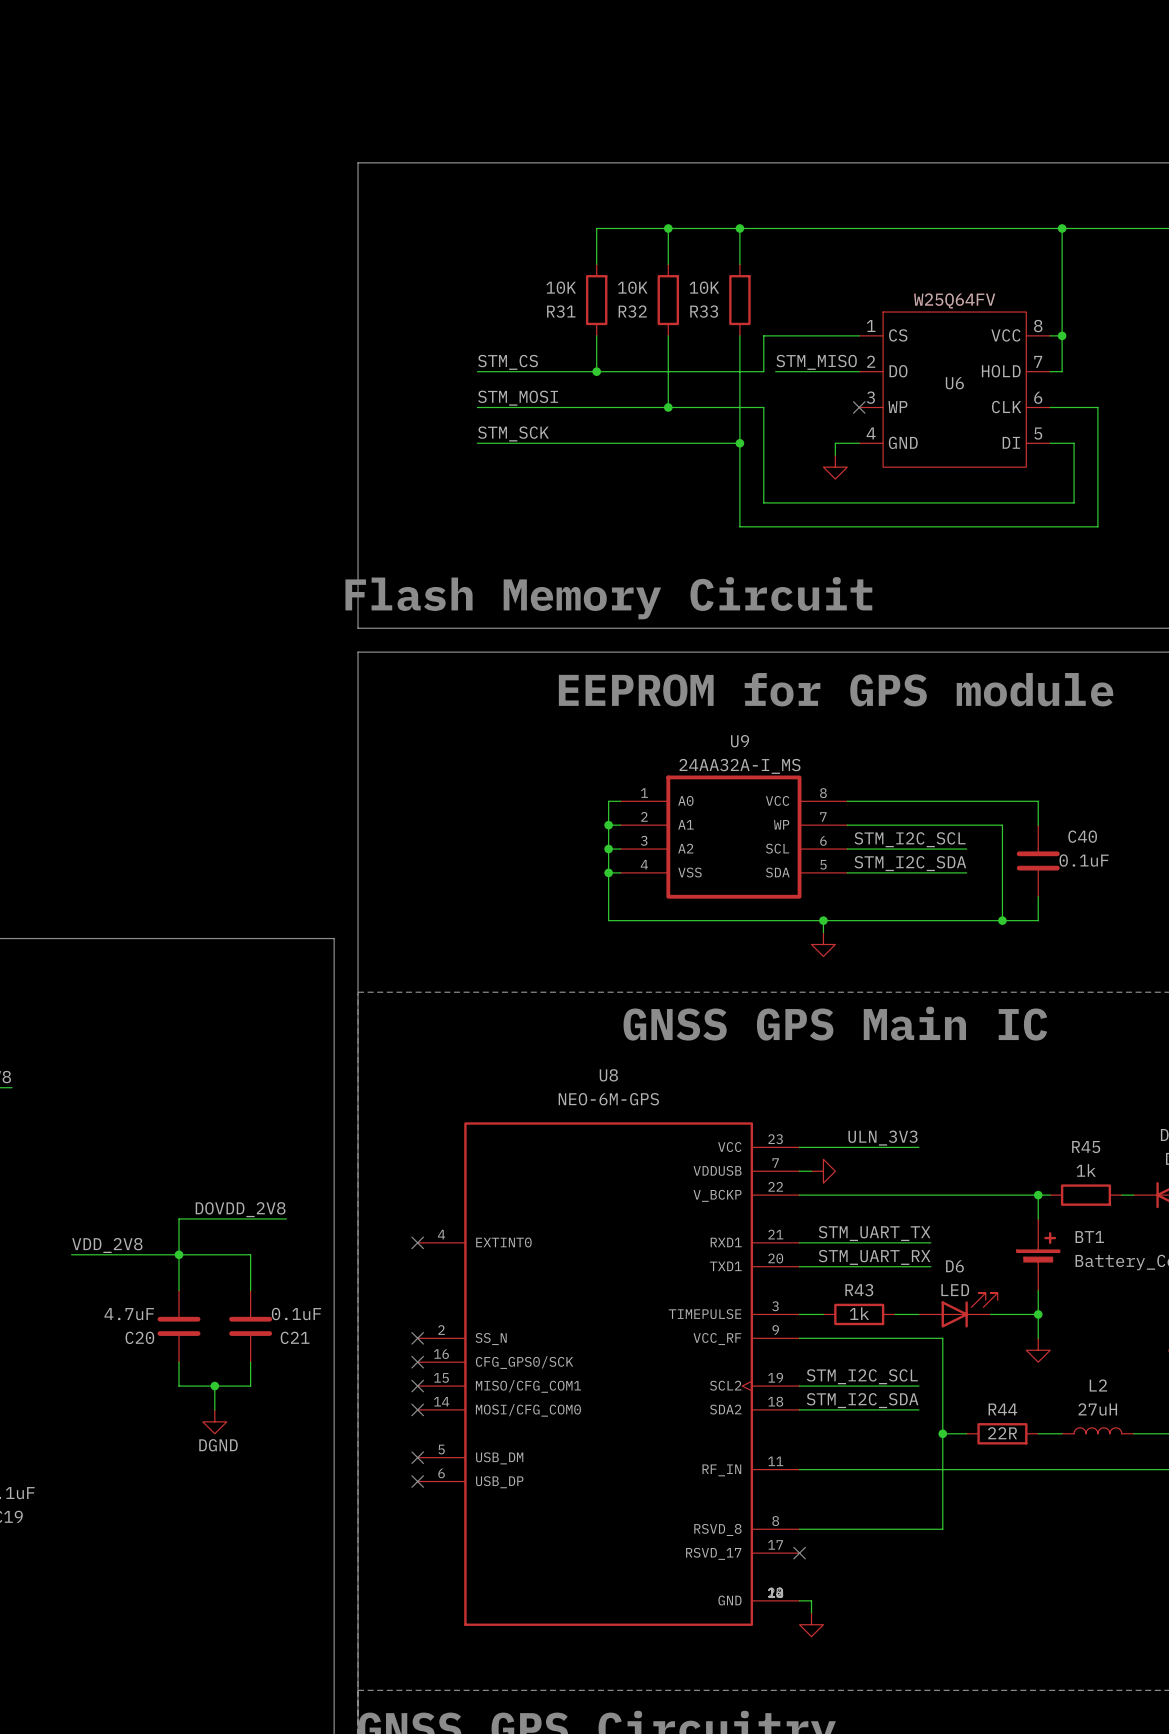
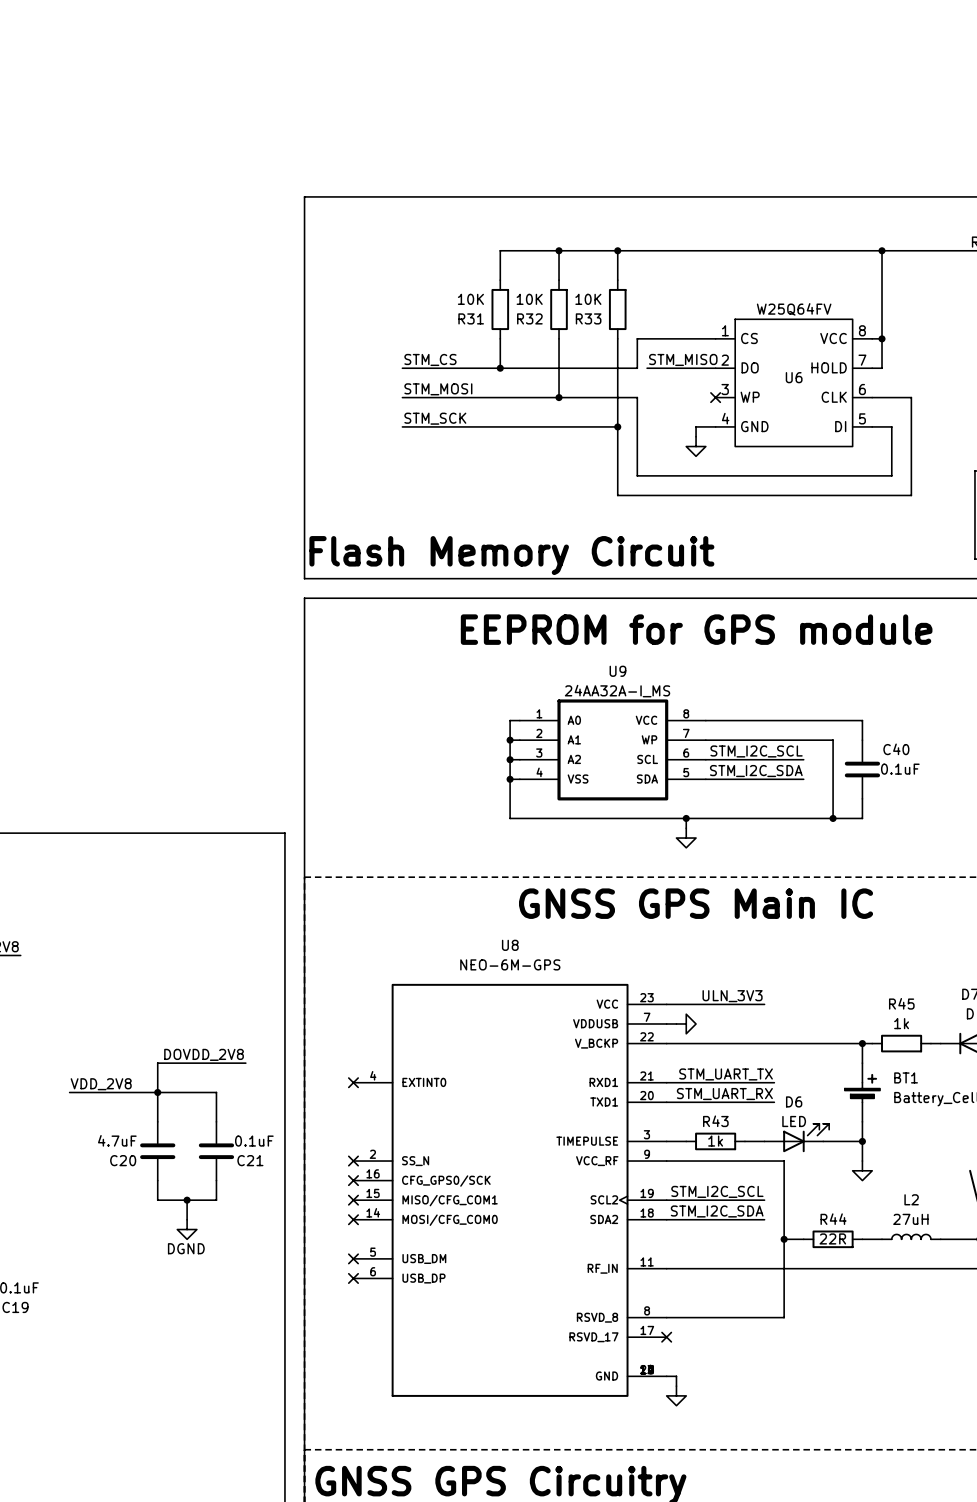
U6 value: W25Q64FV (954, 300) -> none

